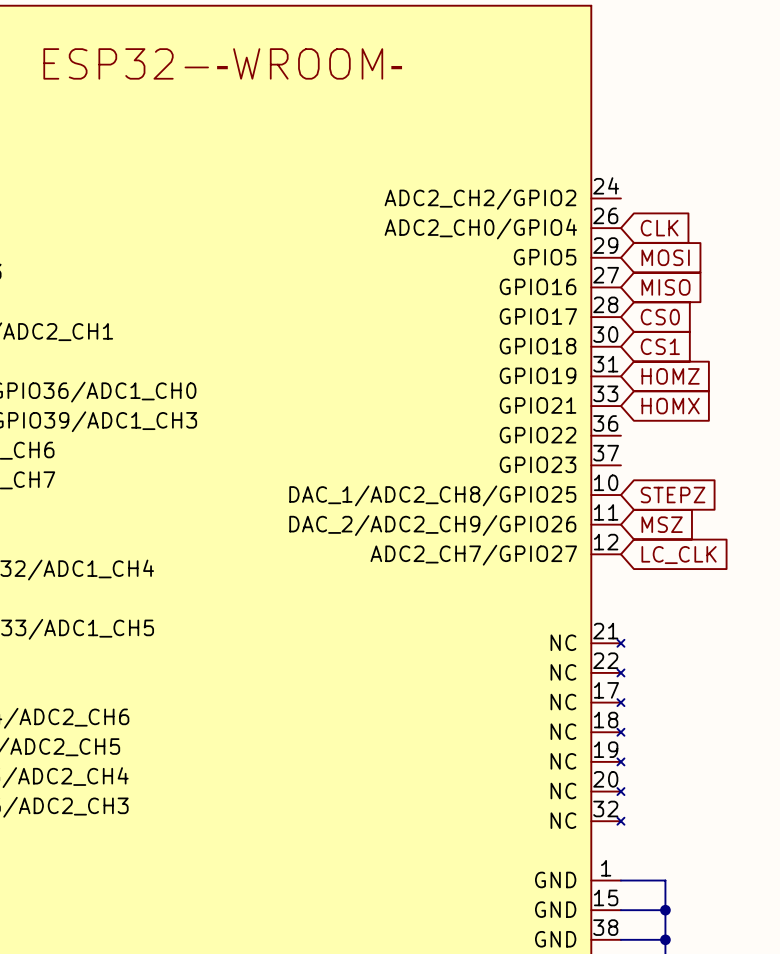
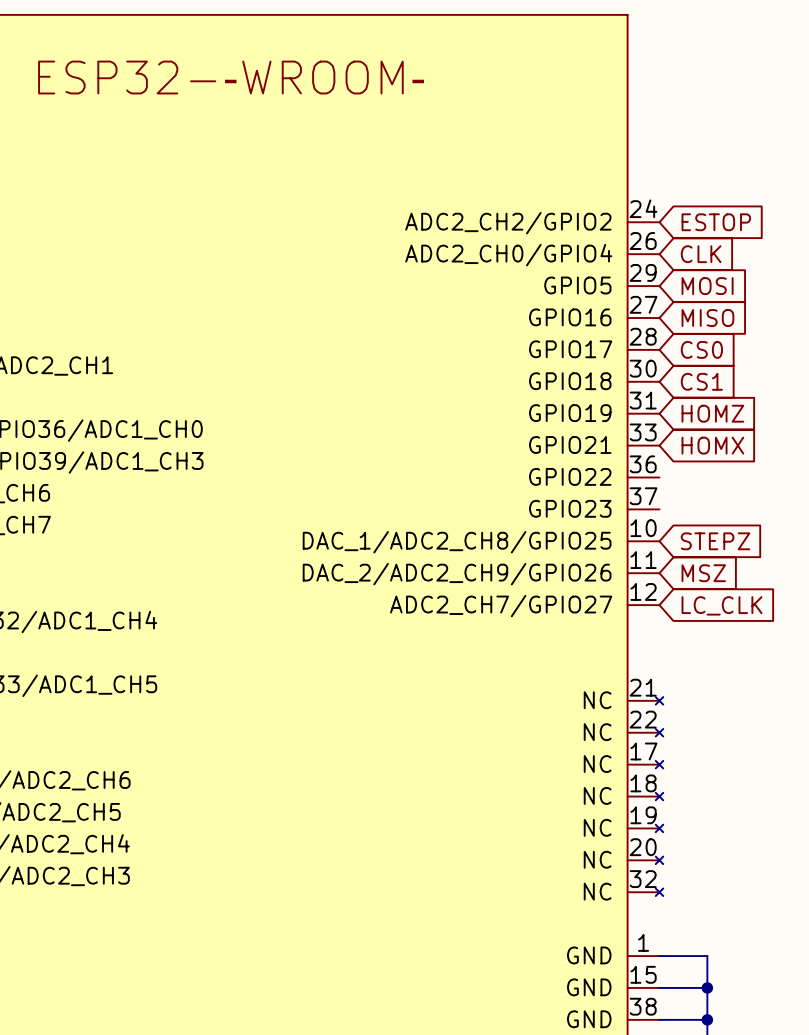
global label: none -> ESTOP (716, 222)

